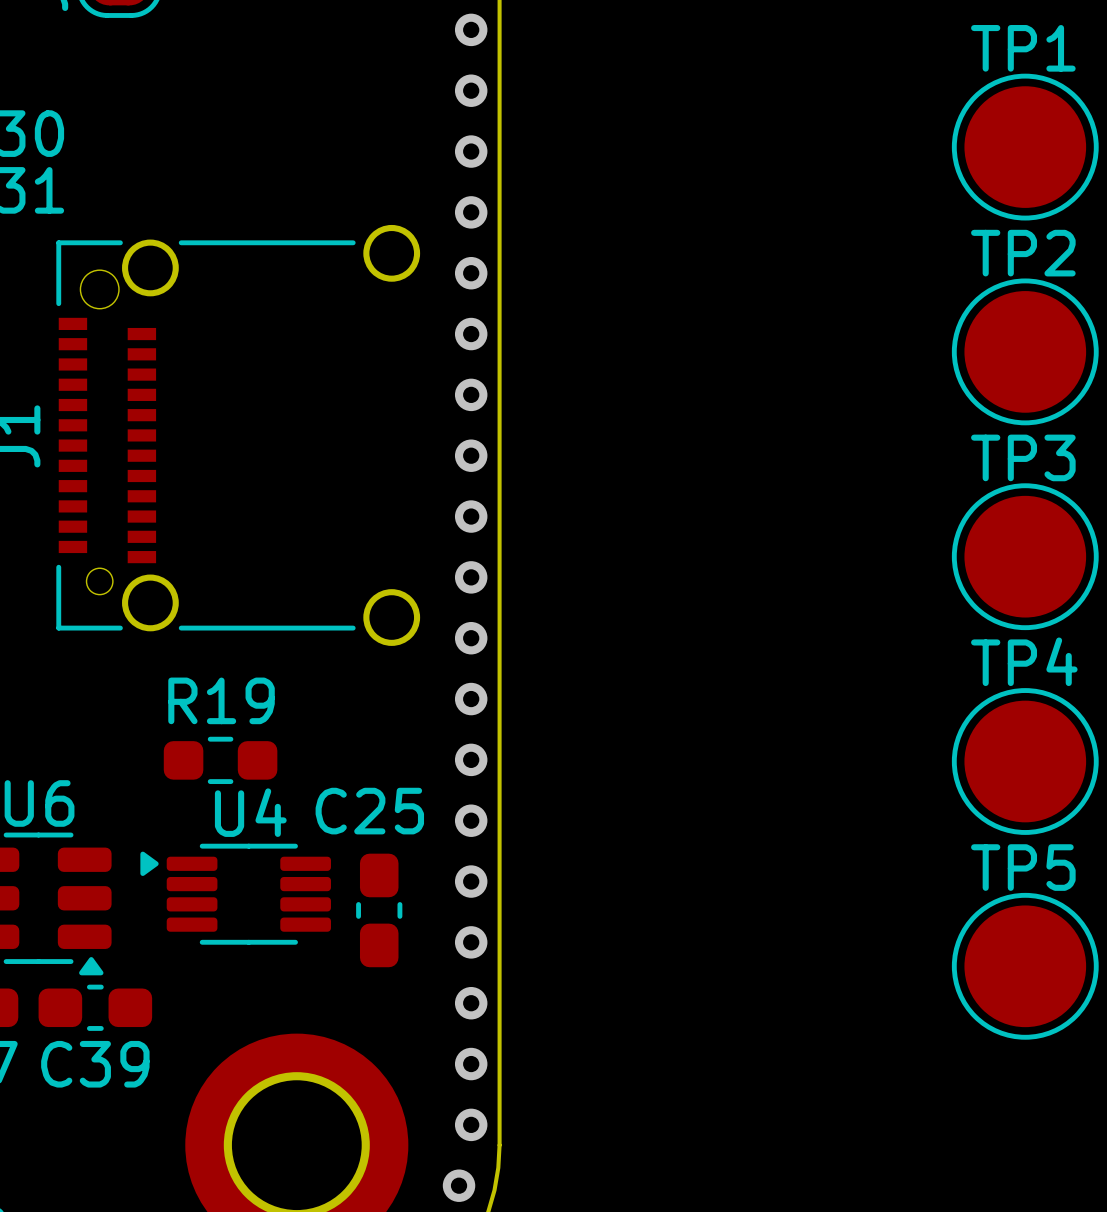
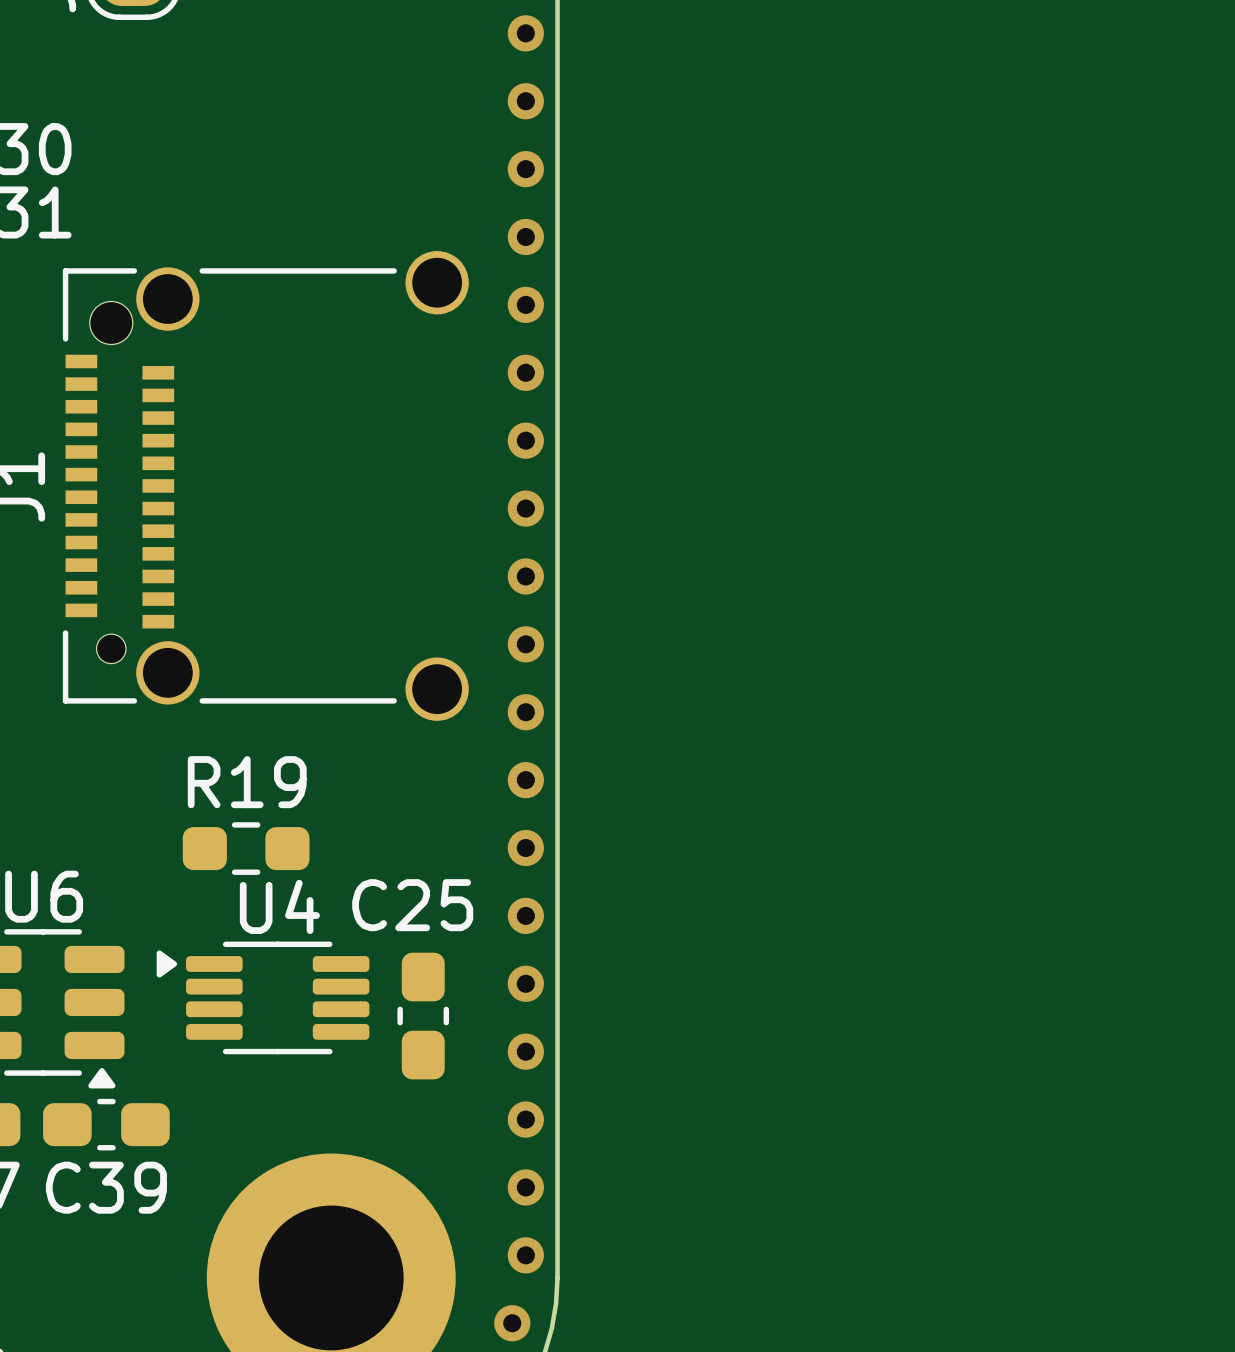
TP1: (1025, 147) -> none
TP2: (1025, 351) -> none
TP3: (1025, 556) -> none
TP4: (1025, 761) -> none
TP5: (1025, 966) -> none

